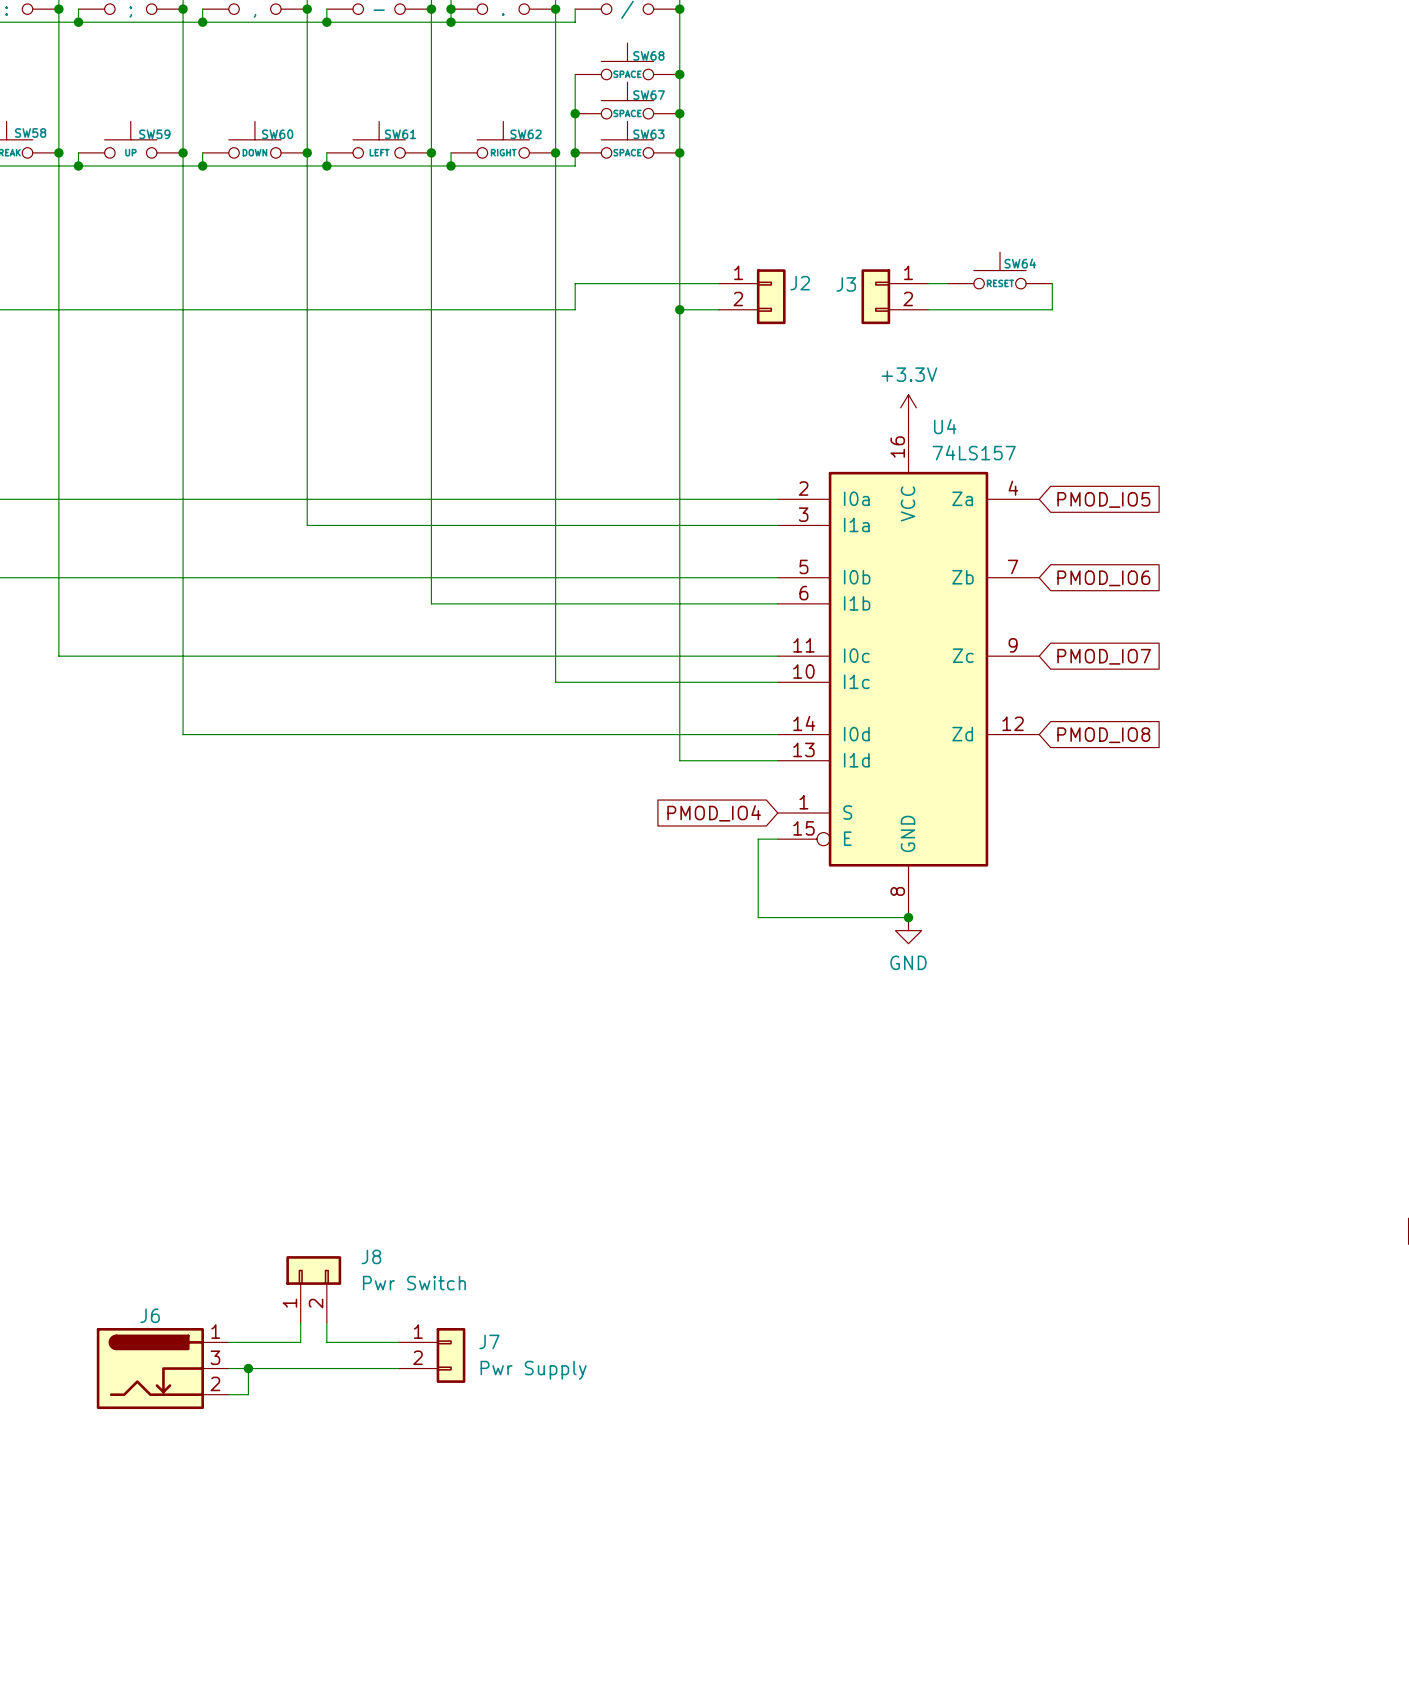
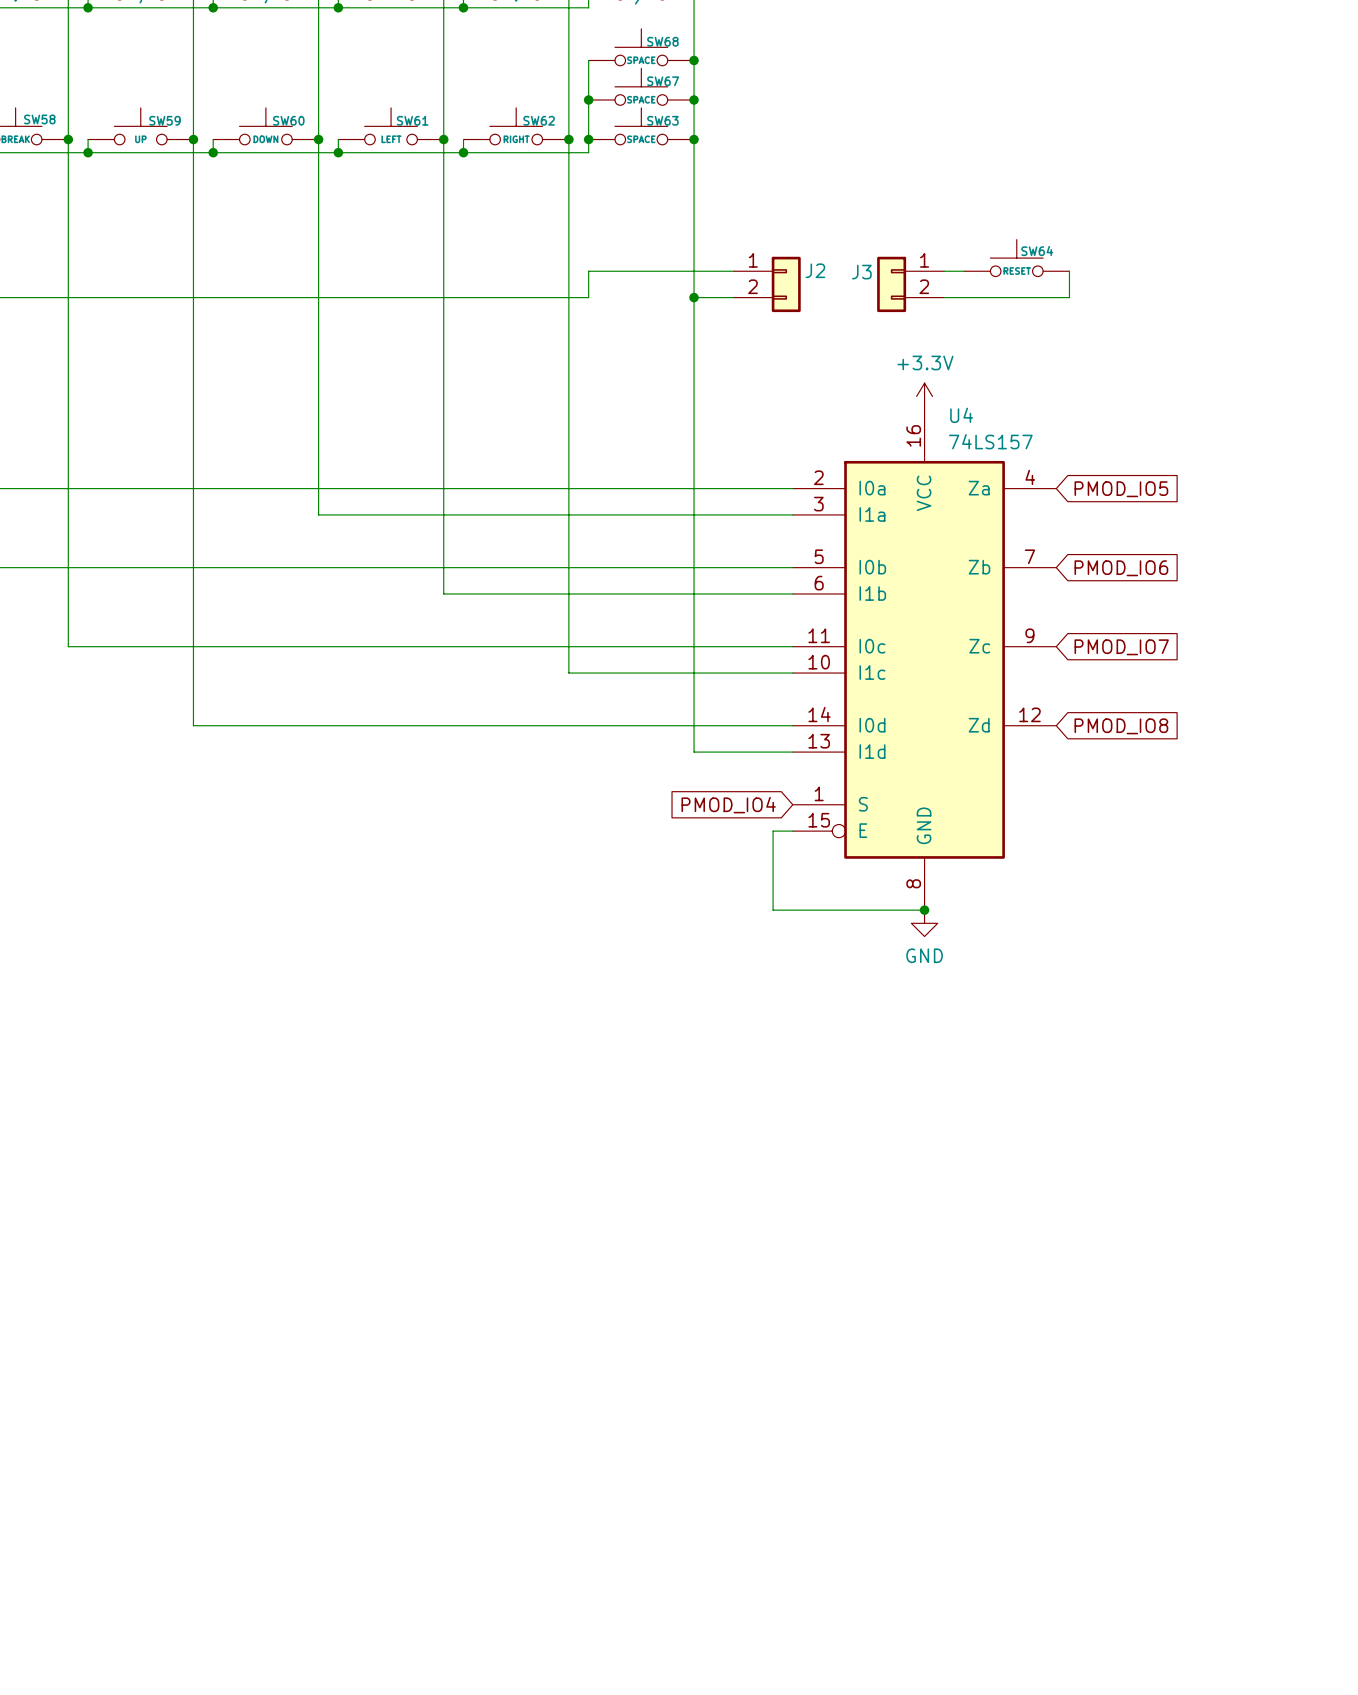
J8: Pwr Switch (313, 1289) -> none
wire: (300, 1322) (300, 1342) (228, 1342) -> none
wire: (326, 1322) (326, 1342) (398, 1342) -> none
J7: Pwr Supply (432, 1355) -> none
J6: (162, 1368) -> none
wire: (228, 1368) (398, 1368) -> none
wire: (248, 1368) (248, 1394) (228, 1394) -> none
junction: (248, 1368) -> none

